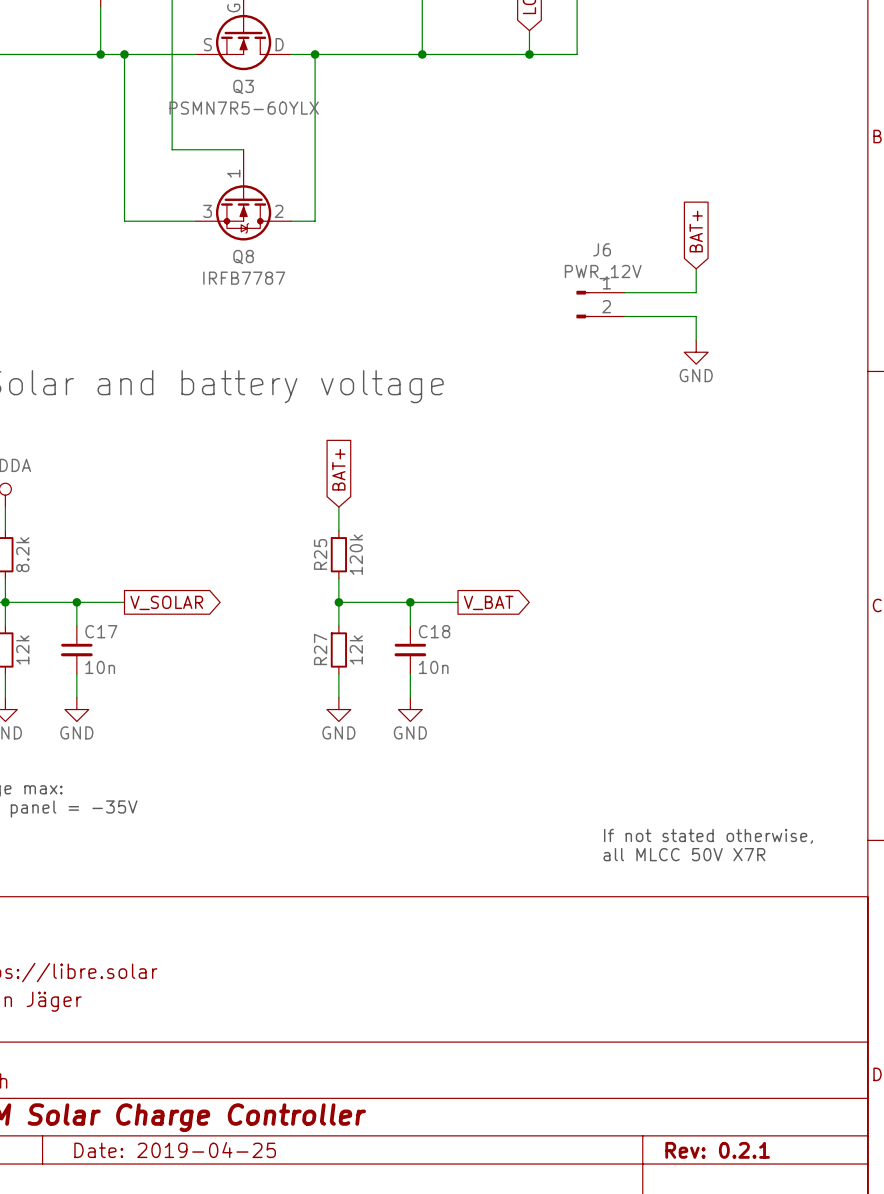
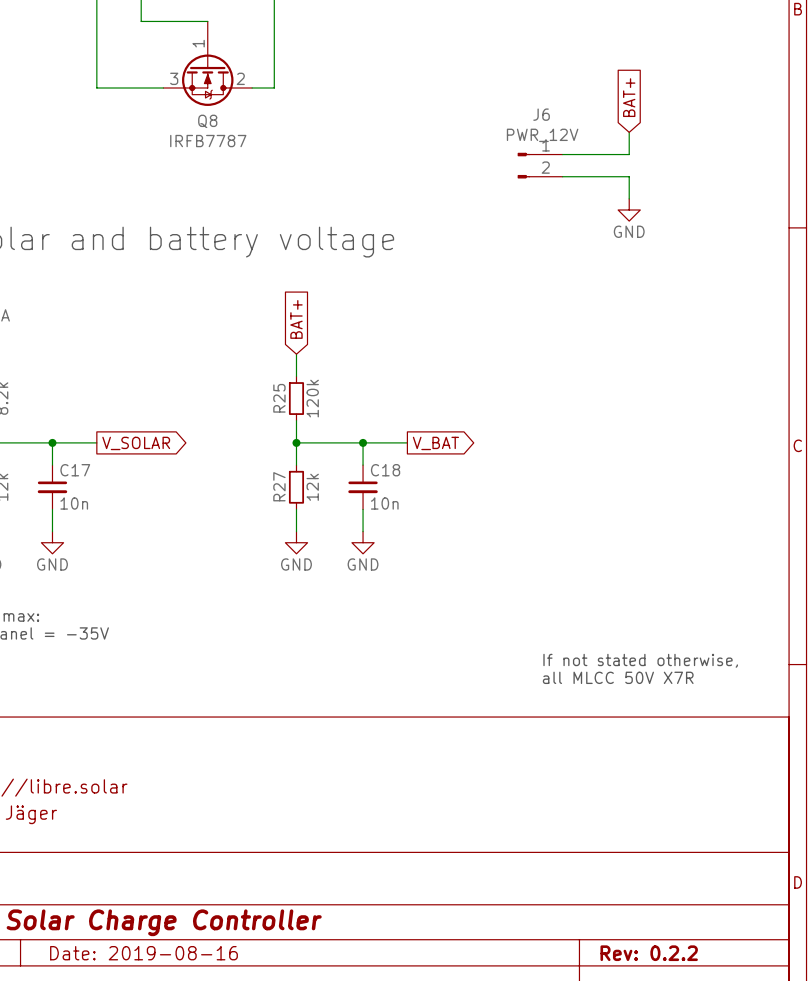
title block: Date: 2019-04-25 (175, 1150) -> Date: 2019-08-16 (143, 953)
title block: Rev: 0.2.1 (717, 1150) -> Rev: 0.2.2 (649, 953)

